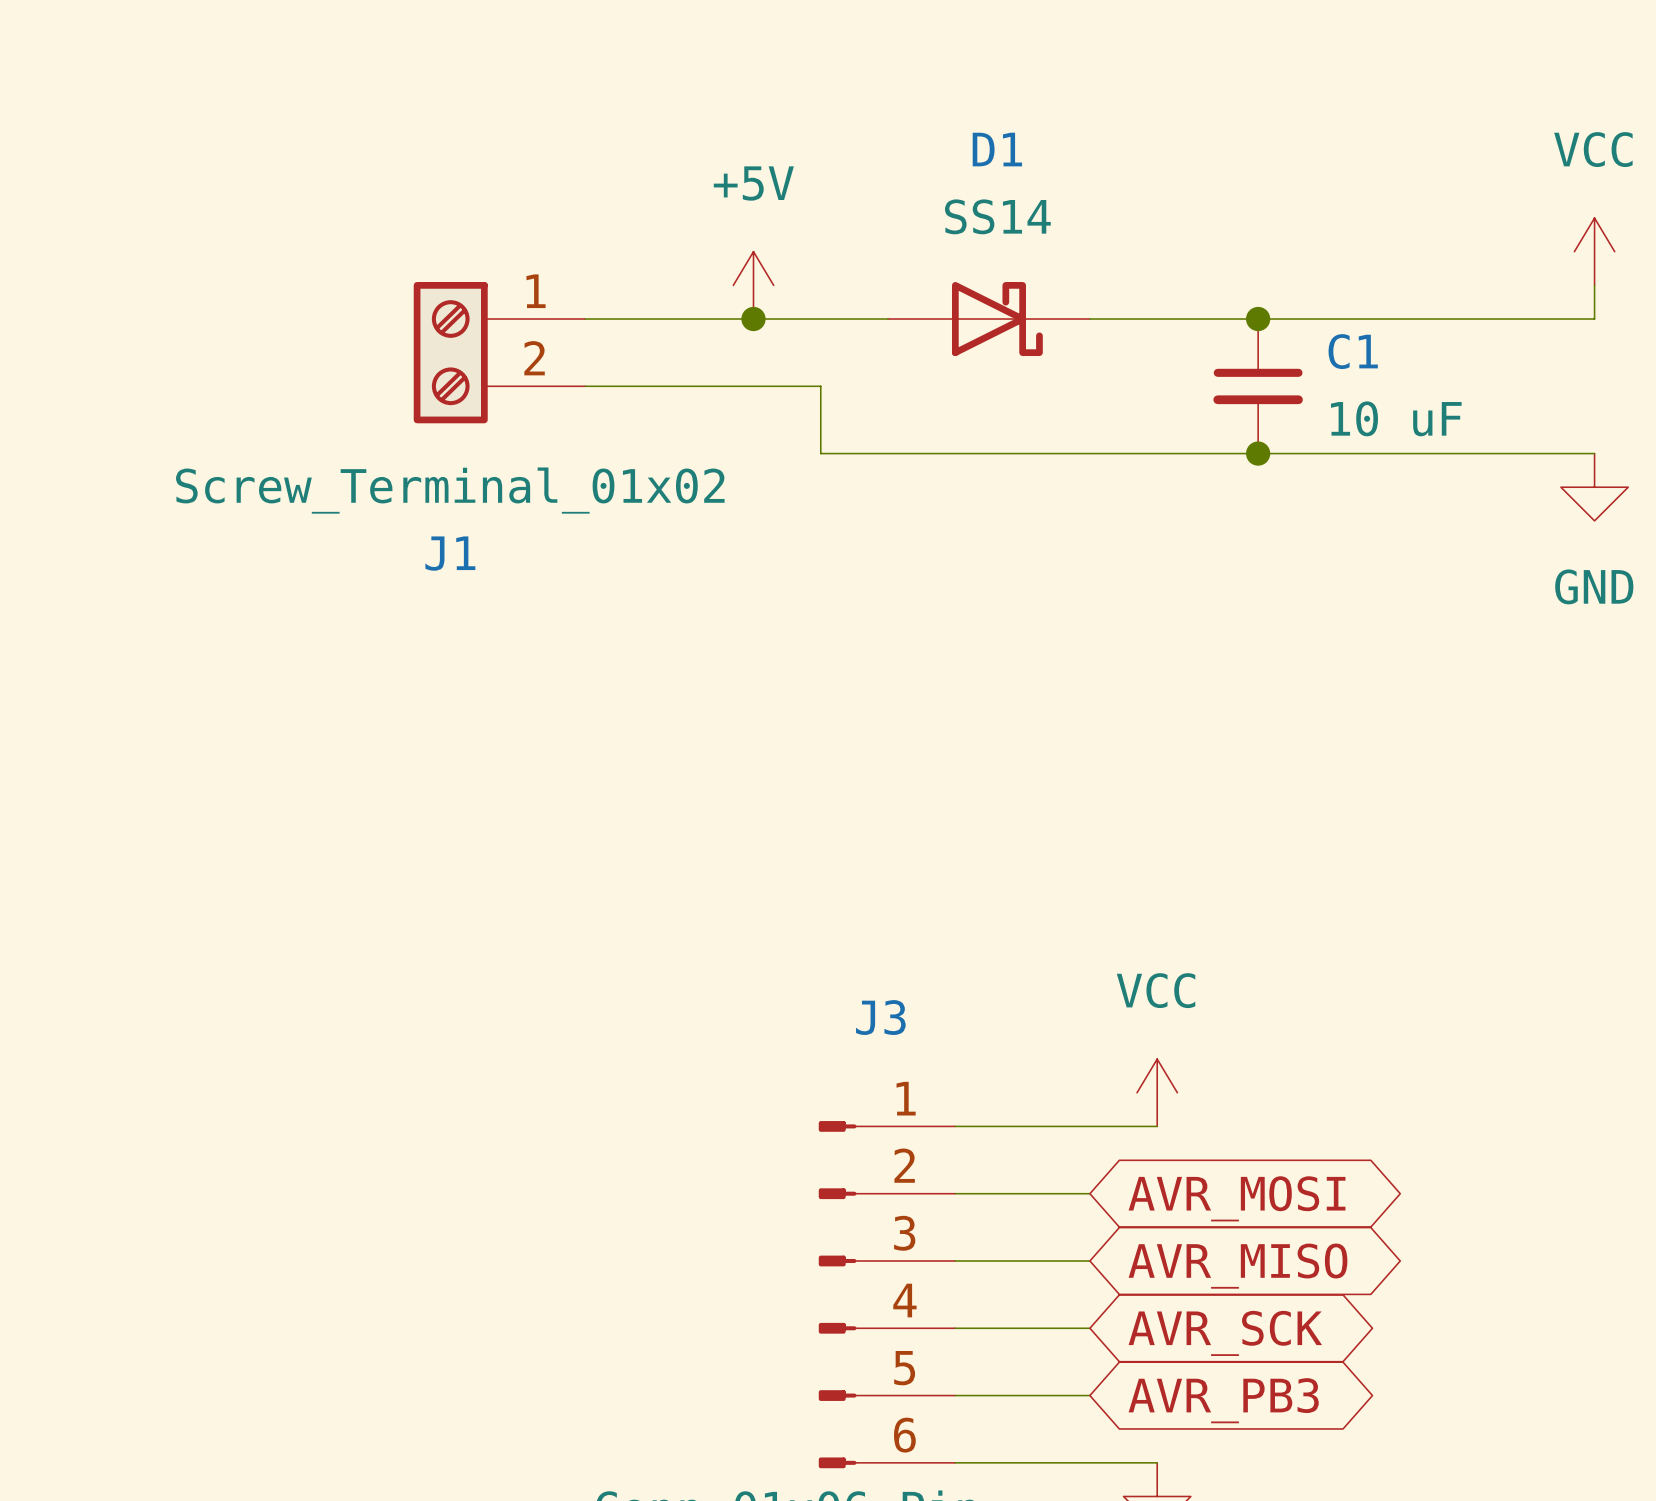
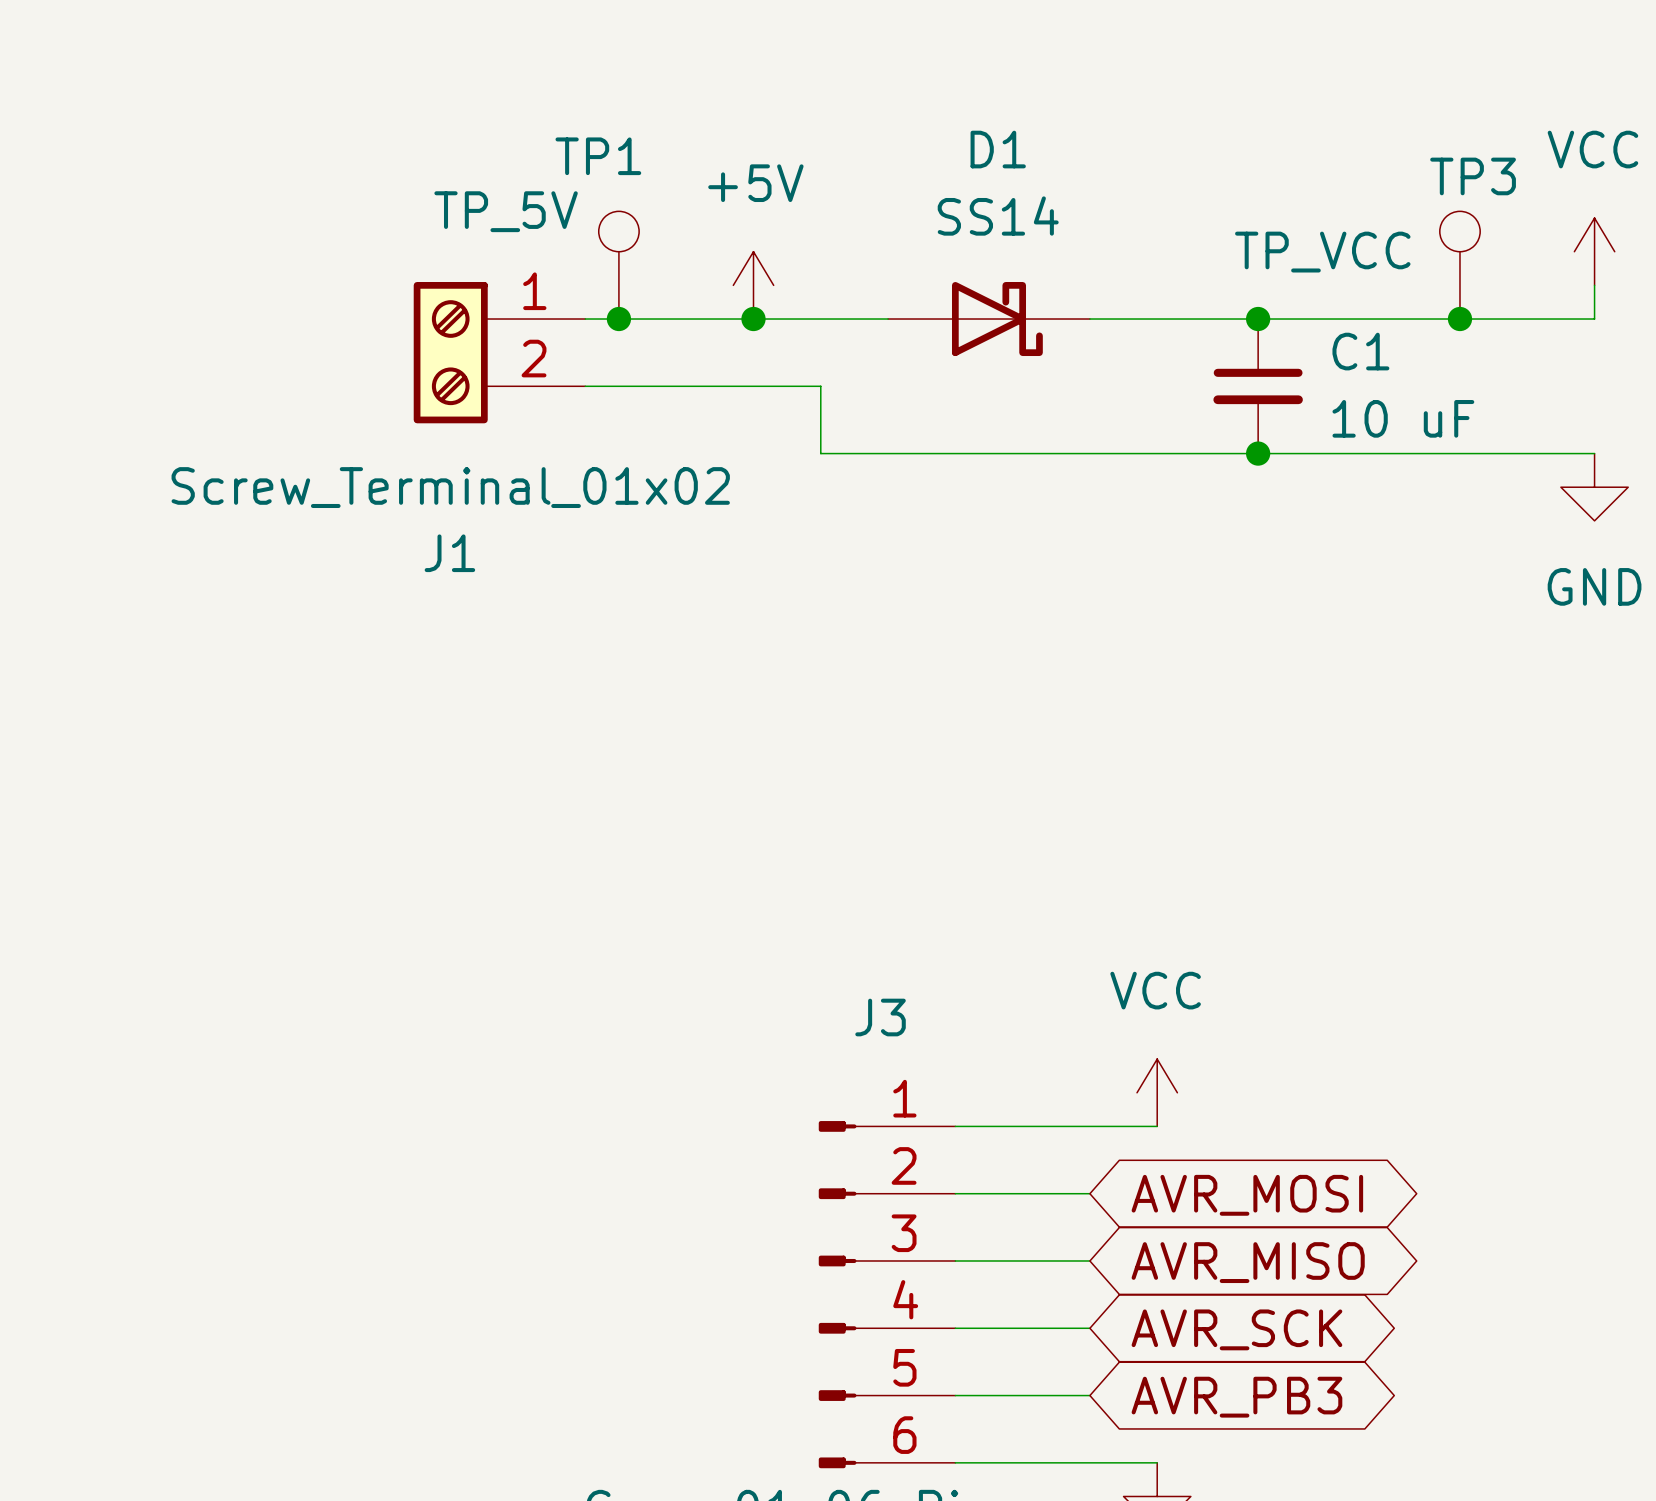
TP1: none -> TP_5V (618, 265)
TP3: none -> TP_VCC (1459, 265)
junction: none -> (618, 319)
junction: none -> (1459, 319)

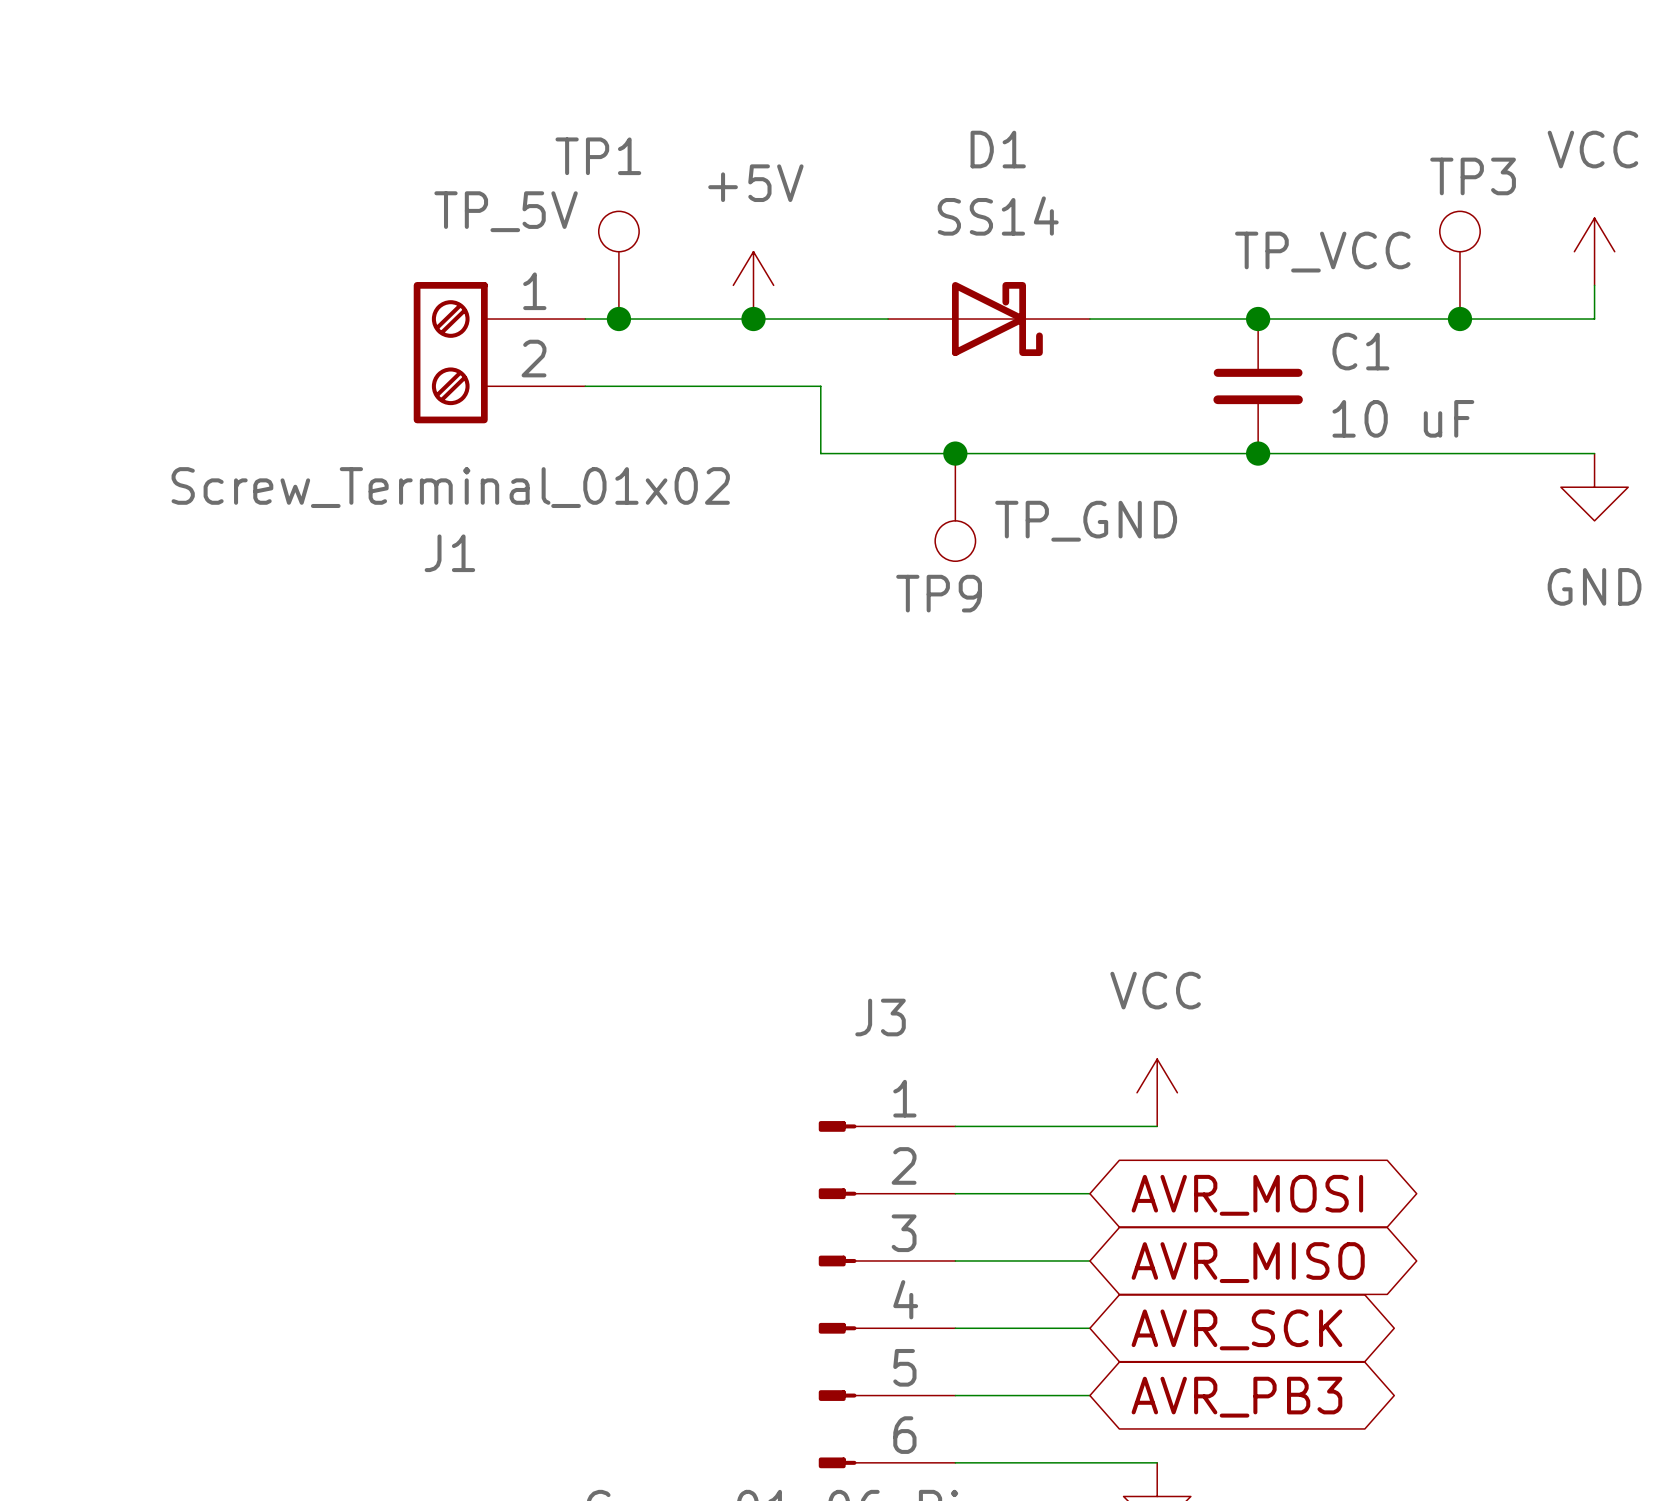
junction: none -> (955, 453)
TP9: none -> TP_GND (955, 507)

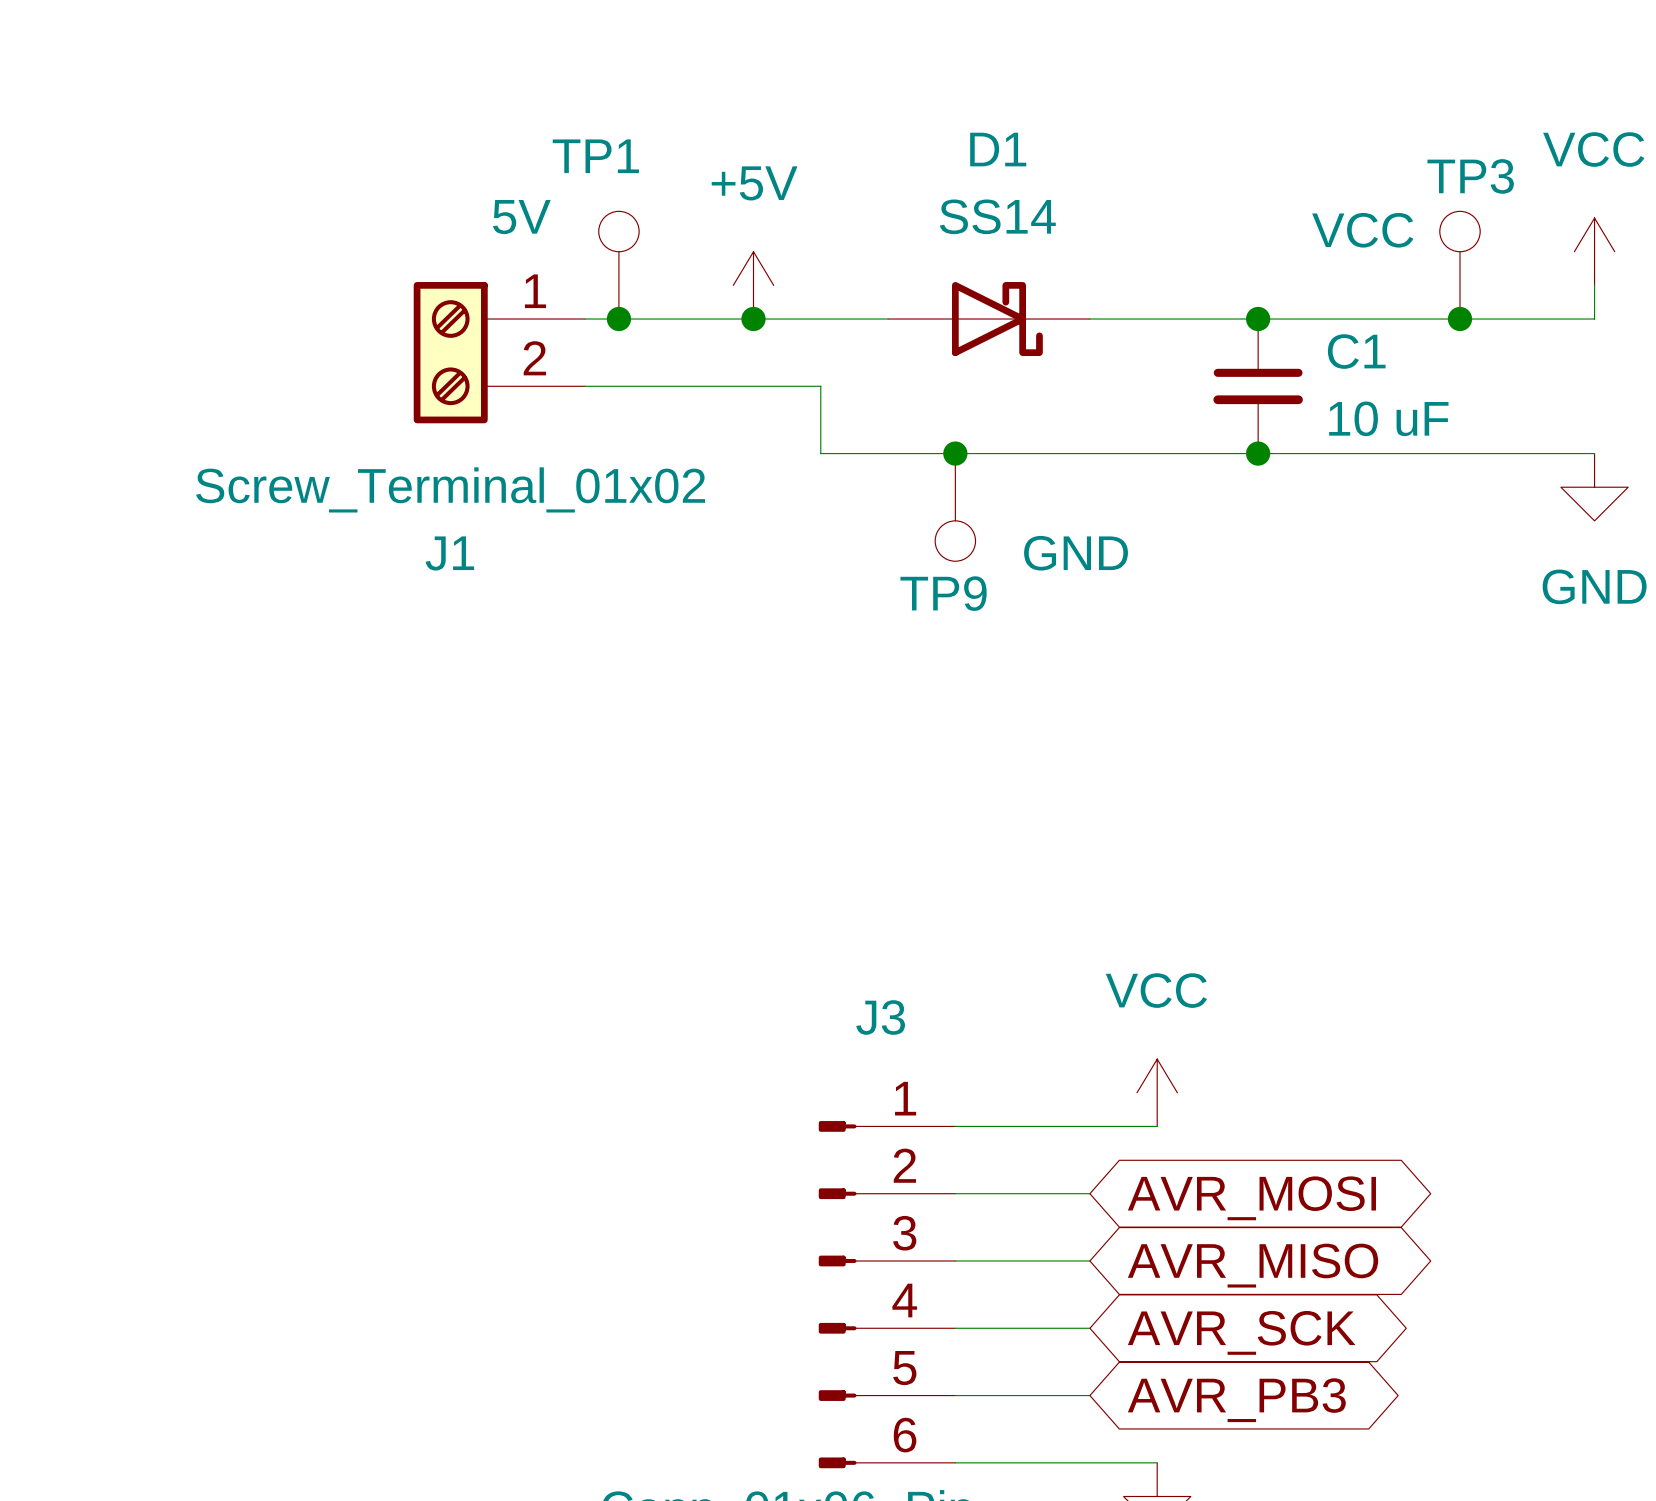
TP1 value: TP_5V (506, 211) -> 5V (521, 217)
TP3 value: TP_VCC (1322, 252) -> VCC (1362, 230)
TP9 value: TP_GND (1086, 521) -> GND (1076, 553)

